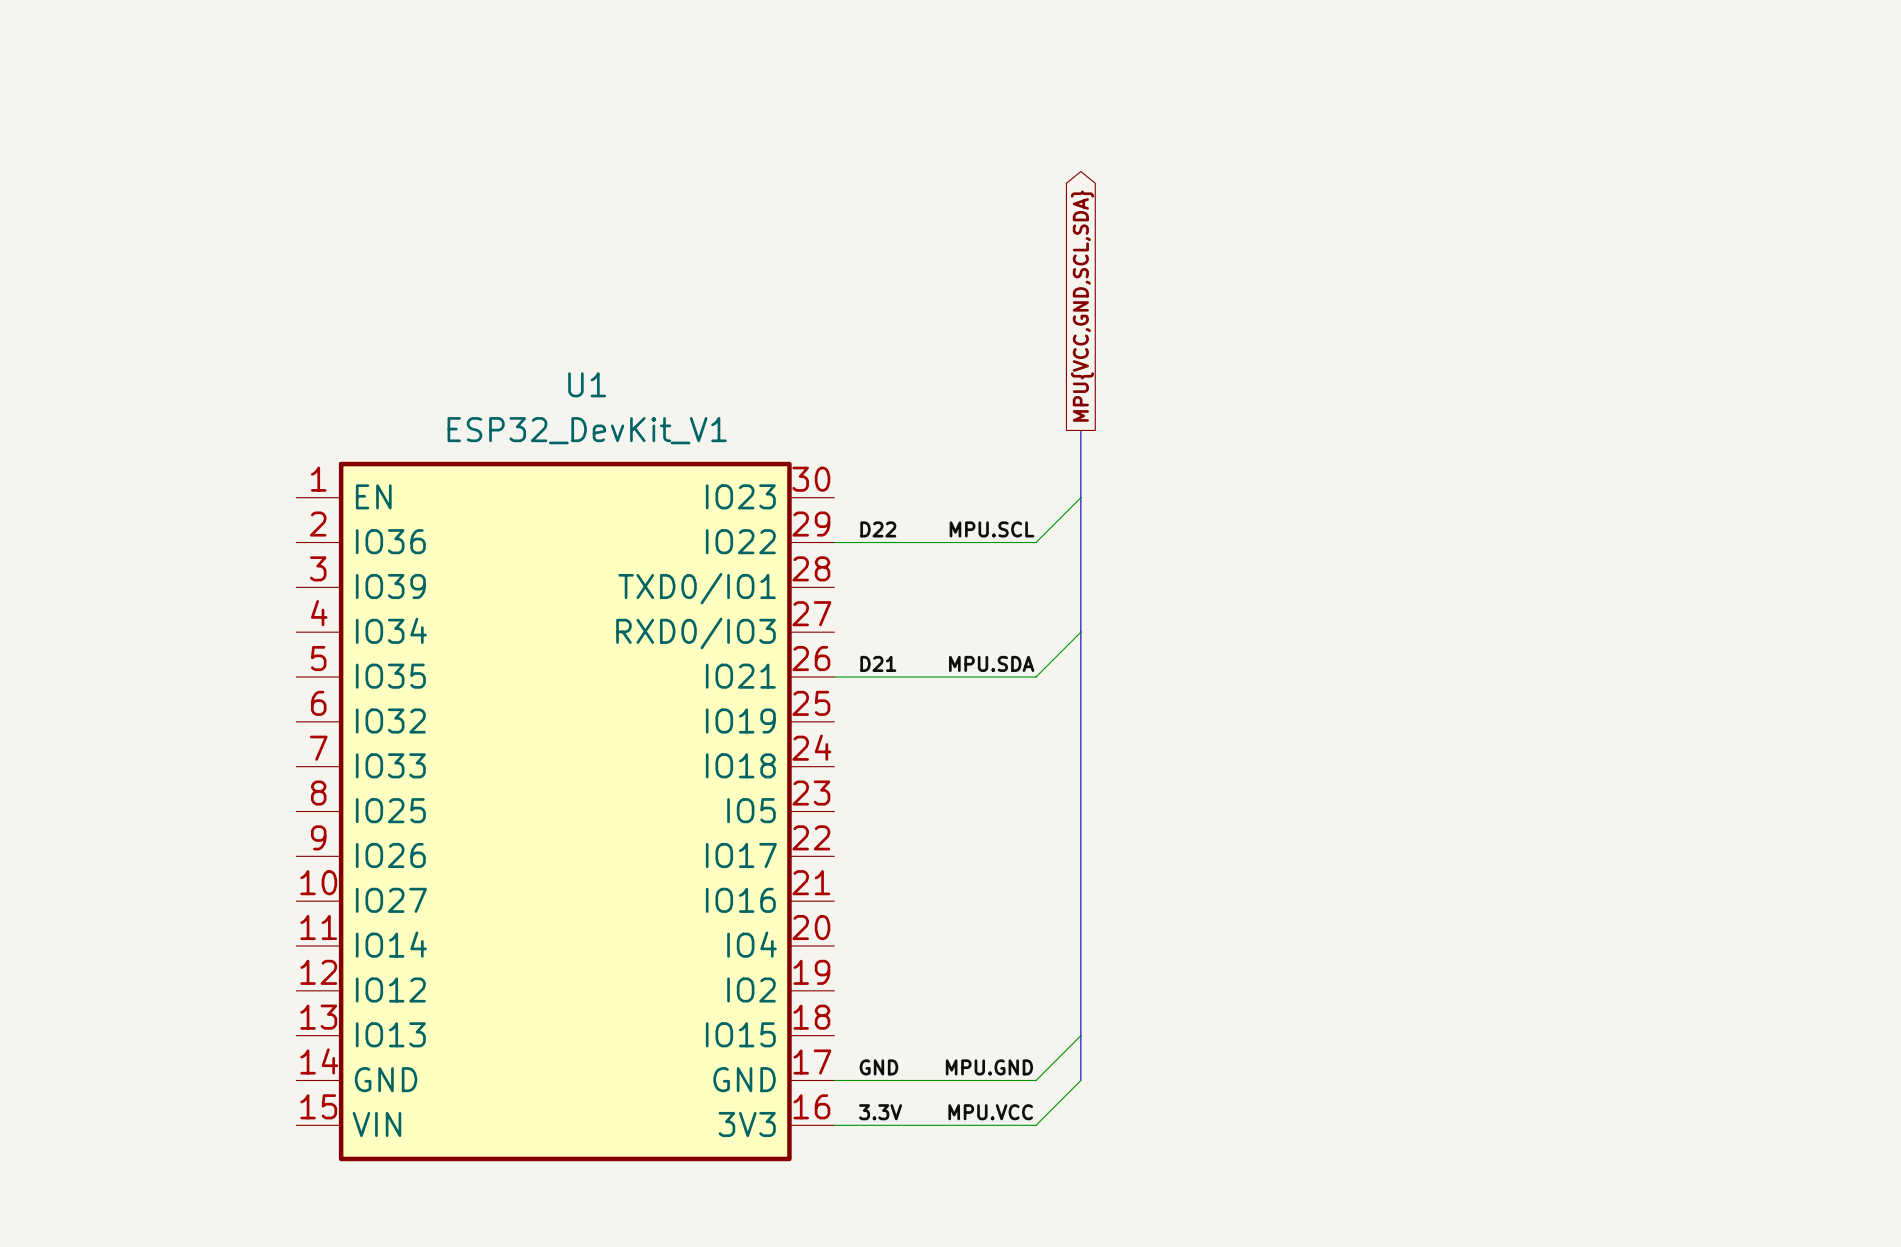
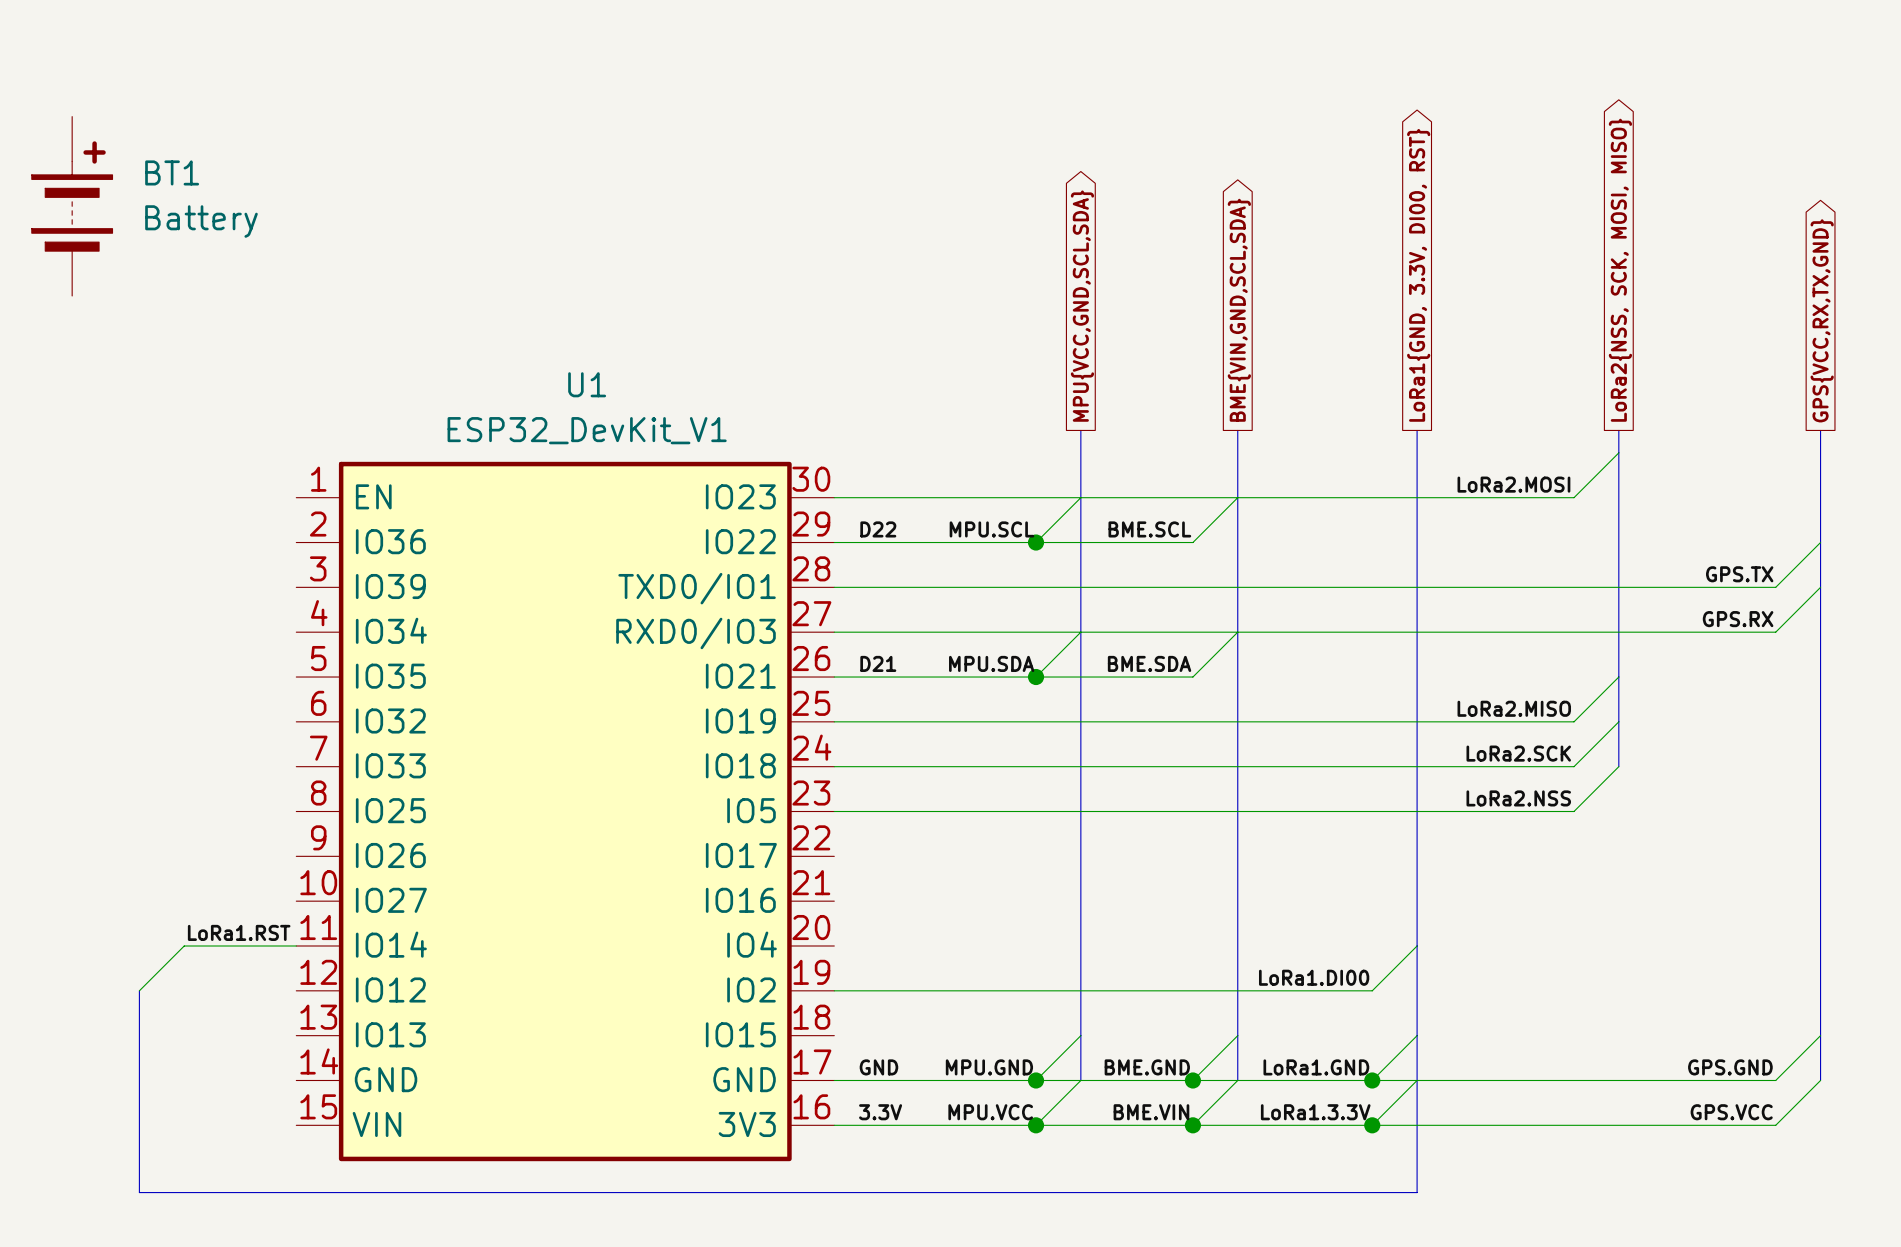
BT1: none -> Battery (72, 206)
global label: none -> LoRa2{NSS, SCK, MOSI, MISO} (1620, 270)
global label: none -> LoRa1{GND, 3.3V, DI00, RST} (1418, 275)
global label: none -> BME{VIN,GND,SCL,SDA} (1239, 310)
global label: none -> GPS{VCC,RX,TX,GND} (1822, 320)
bus: none -> (1237, 430) (1237, 1080)
bus: none -> (1417, 430) (1417, 1192) (139, 1192) (139, 990)
bus: none -> (1618, 430) (1618, 766)
bus: none -> (1820, 430) (1820, 1080)
wire: none -> (1618, 452) (1573, 497) (834, 497)
label: none -> LoRa2.MOSI (1513, 484)
wire: none -> (1237, 497) (1192, 542) (1036, 542)
label: none -> BME.SCL (1149, 529)
junction: none -> (1036, 542)
wire: none -> (1820, 542) (1775, 587) (834, 587)
label: none -> GPS.TX (1739, 574)
wire: none -> (1820, 587) (1775, 632) (834, 632)
label: none -> GPS.RX (1738, 619)
wire: none -> (1237, 632) (1192, 677) (1036, 677)
label: none -> BME.SDA (1149, 663)
junction: none -> (1036, 677)
wire: none -> (1618, 677) (1573, 721) (834, 721)
label: none -> LoRa2.MISO (1514, 708)
wire: none -> (1618, 721) (1573, 766) (834, 766)
label: none -> LoRa2.SCK (1518, 753)
wire: none -> (1618, 766) (1573, 811) (834, 811)
label: none -> LoRa2.NSS (1518, 798)
label: none -> LoRa1.RST (239, 932)
wire: none -> (296, 945) (184, 945) (139, 990)
wire: none -> (1417, 945) (1372, 990) (834, 990)
label: none -> LoRa1.DI00 (1314, 977)
wire: none -> (1237, 1035) (1192, 1080)
wire: none -> (1417, 1035) (1372, 1080)
wire: none -> (1820, 1035) (1775, 1080) (1036, 1080)
label: none -> BME.GND (1147, 1067)
label: none -> LoRa1.GND (1316, 1067)
label: none -> GPS.GND (1730, 1067)
junction: none -> (1036, 1080)
junction: none -> (1192, 1080)
wire: none -> (1237, 1080) (1192, 1125)
junction: none -> (1372, 1080)
wire: none -> (1417, 1080) (1372, 1125)
wire: none -> (1820, 1080) (1775, 1125) (1036, 1125)
label: none -> BME.VIN (1151, 1112)
label: none -> LoRa1.3.3V (1315, 1112)
label: none -> GPS.VCC (1731, 1112)
junction: none -> (1036, 1125)
junction: none -> (1192, 1125)
junction: none -> (1372, 1125)

